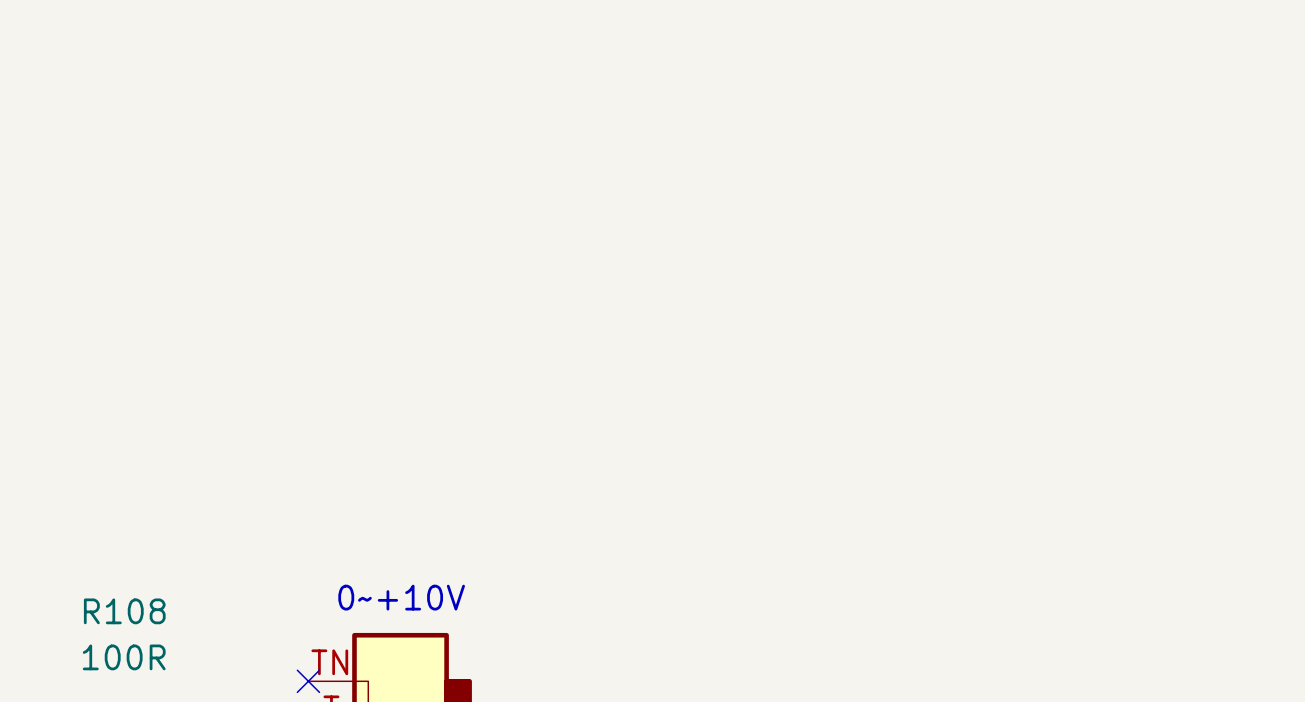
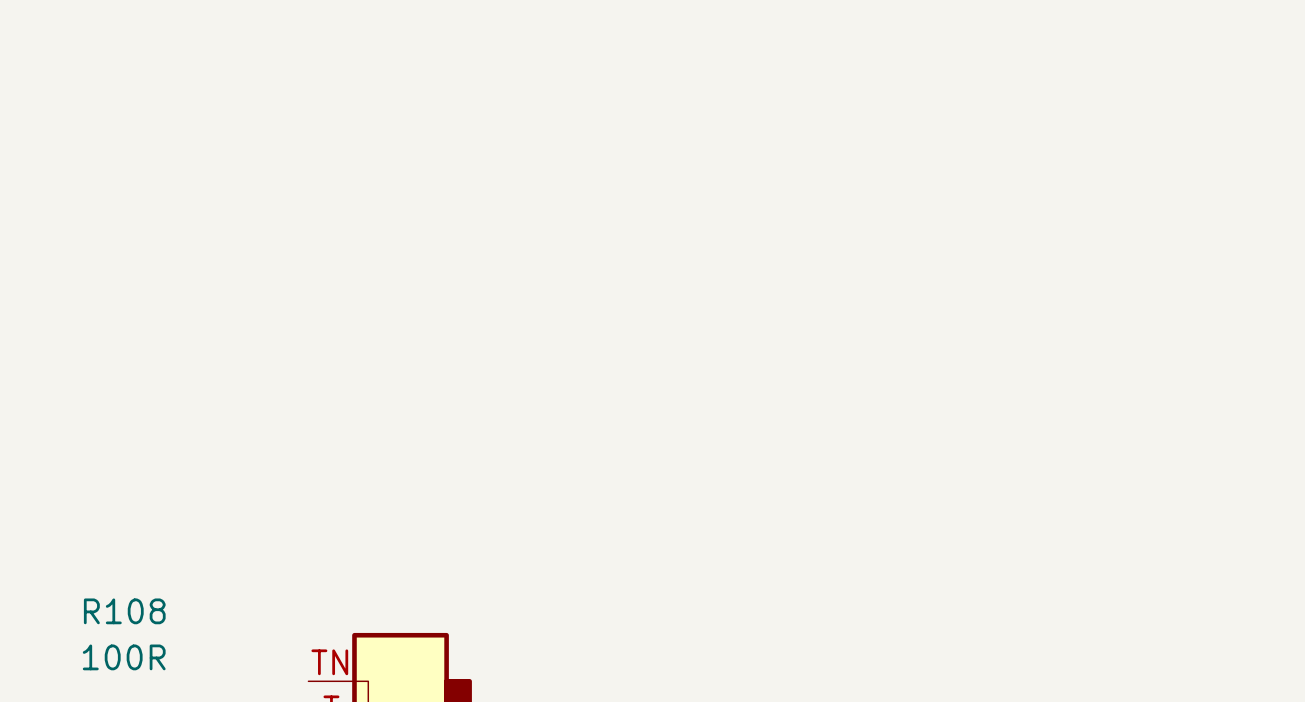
text: 0~+10V (401, 597) -> none
no-connect mark: (308, 681) -> none

